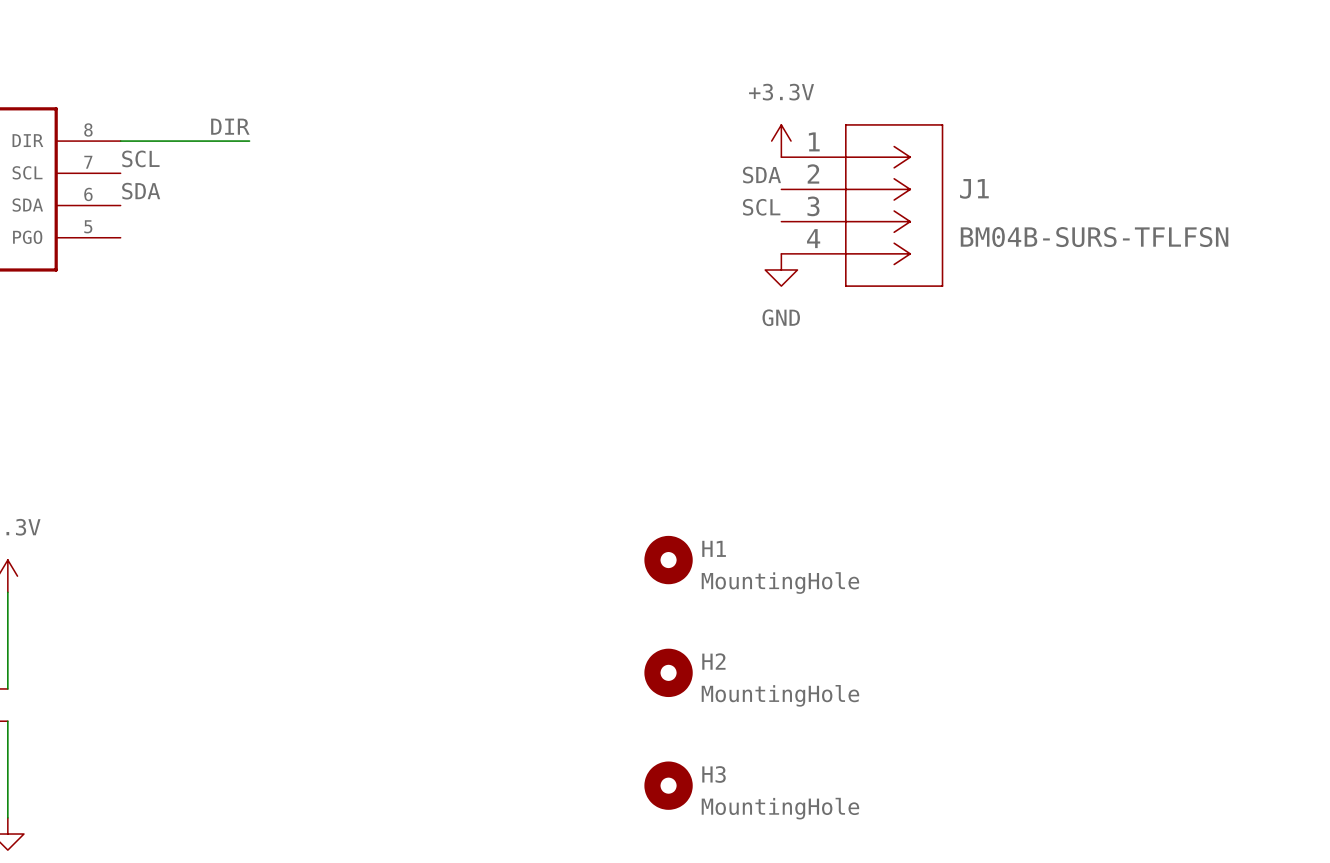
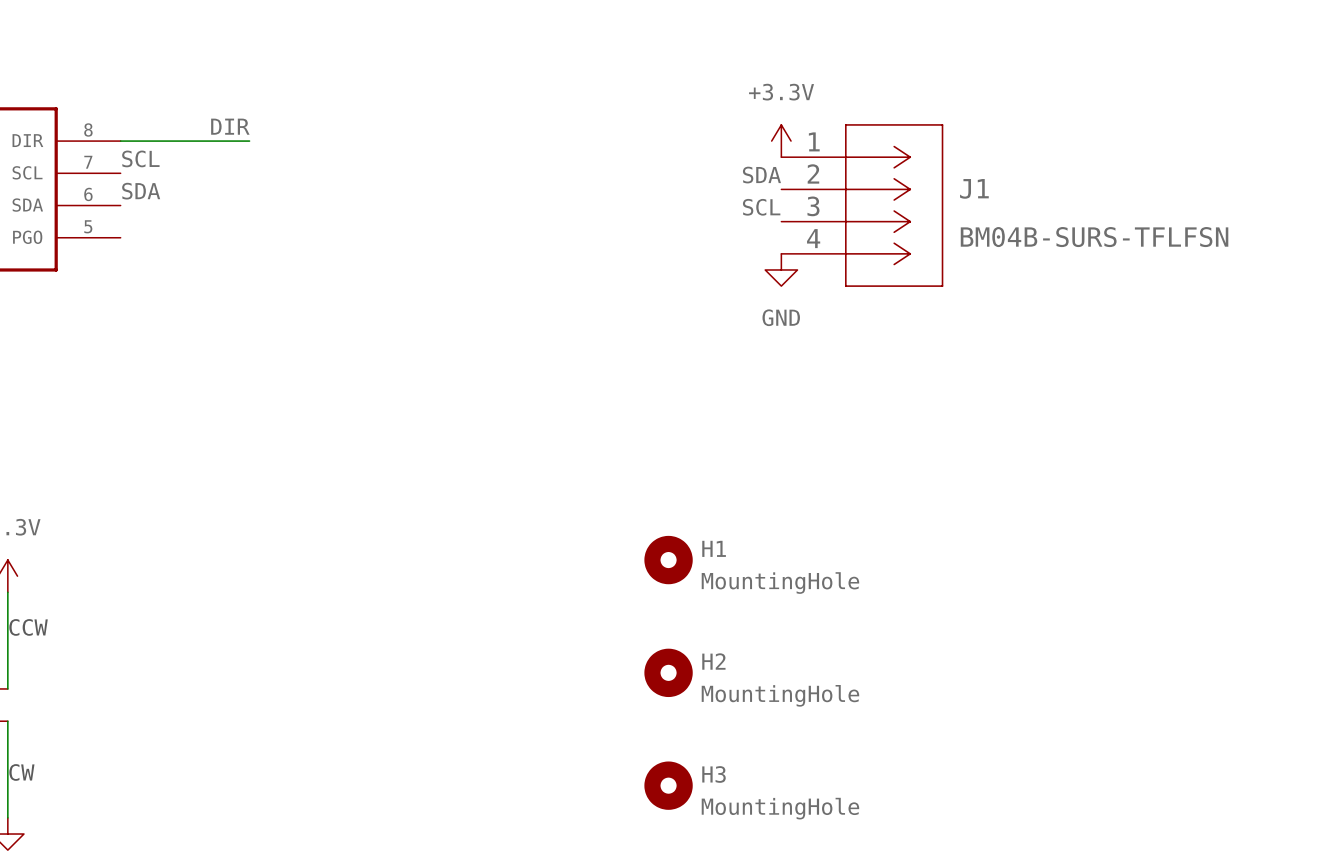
text: none -> CCW (28, 627)
text: none -> CW (21, 772)

